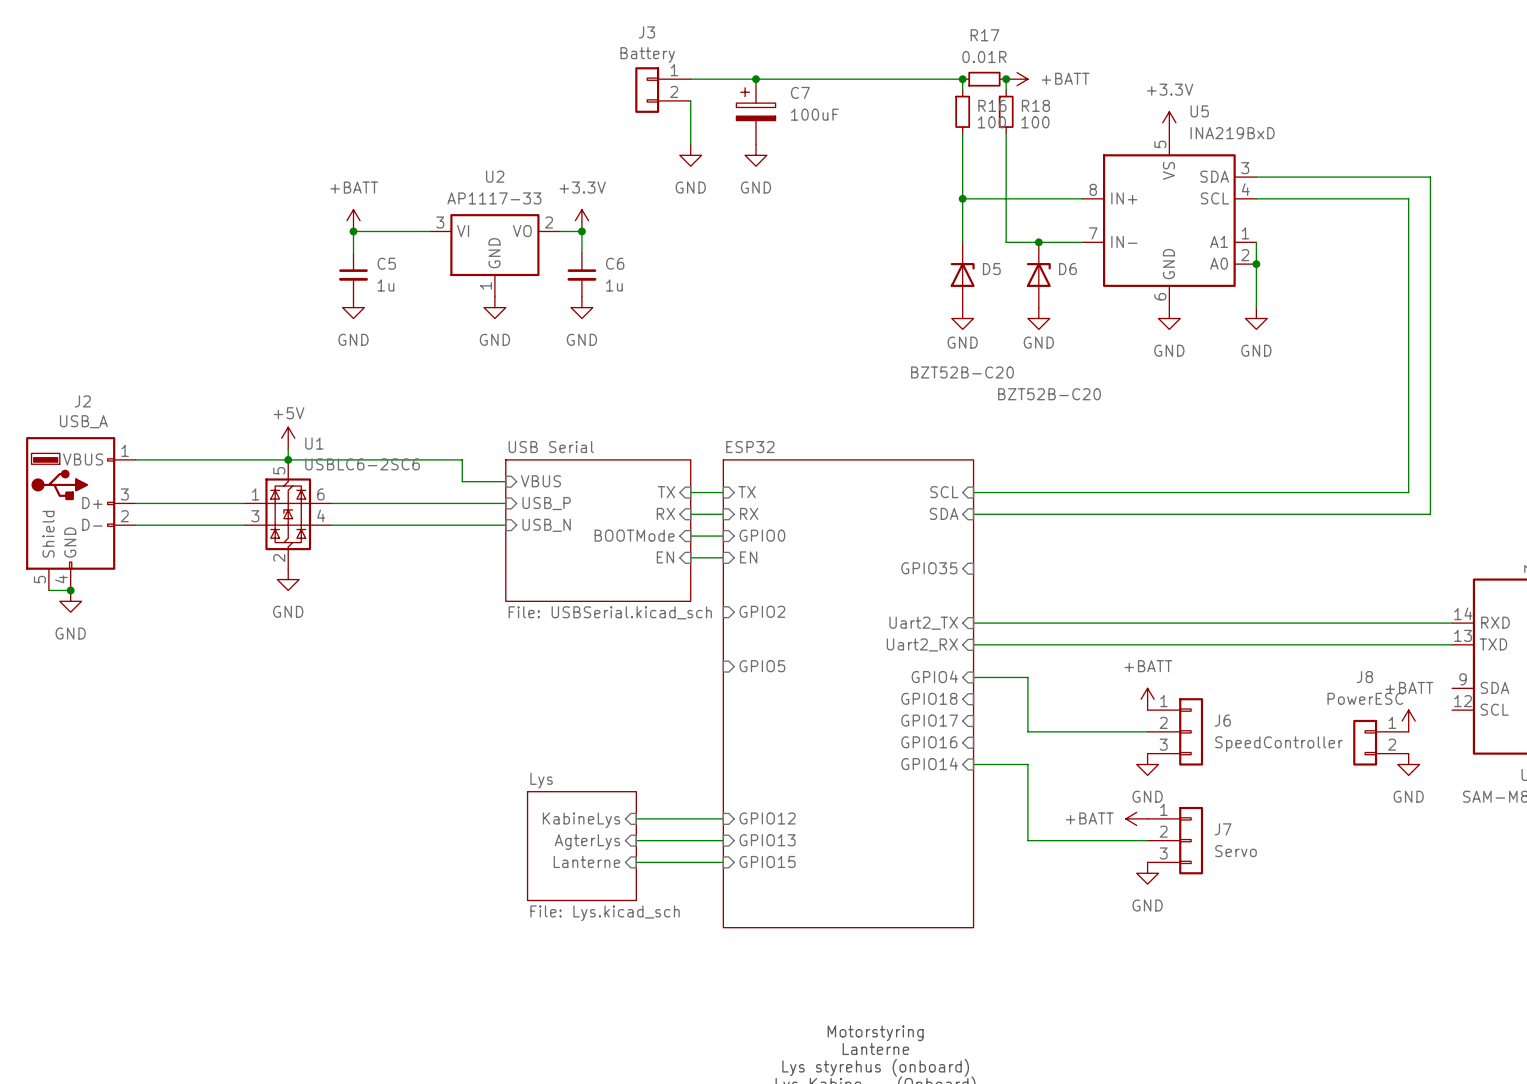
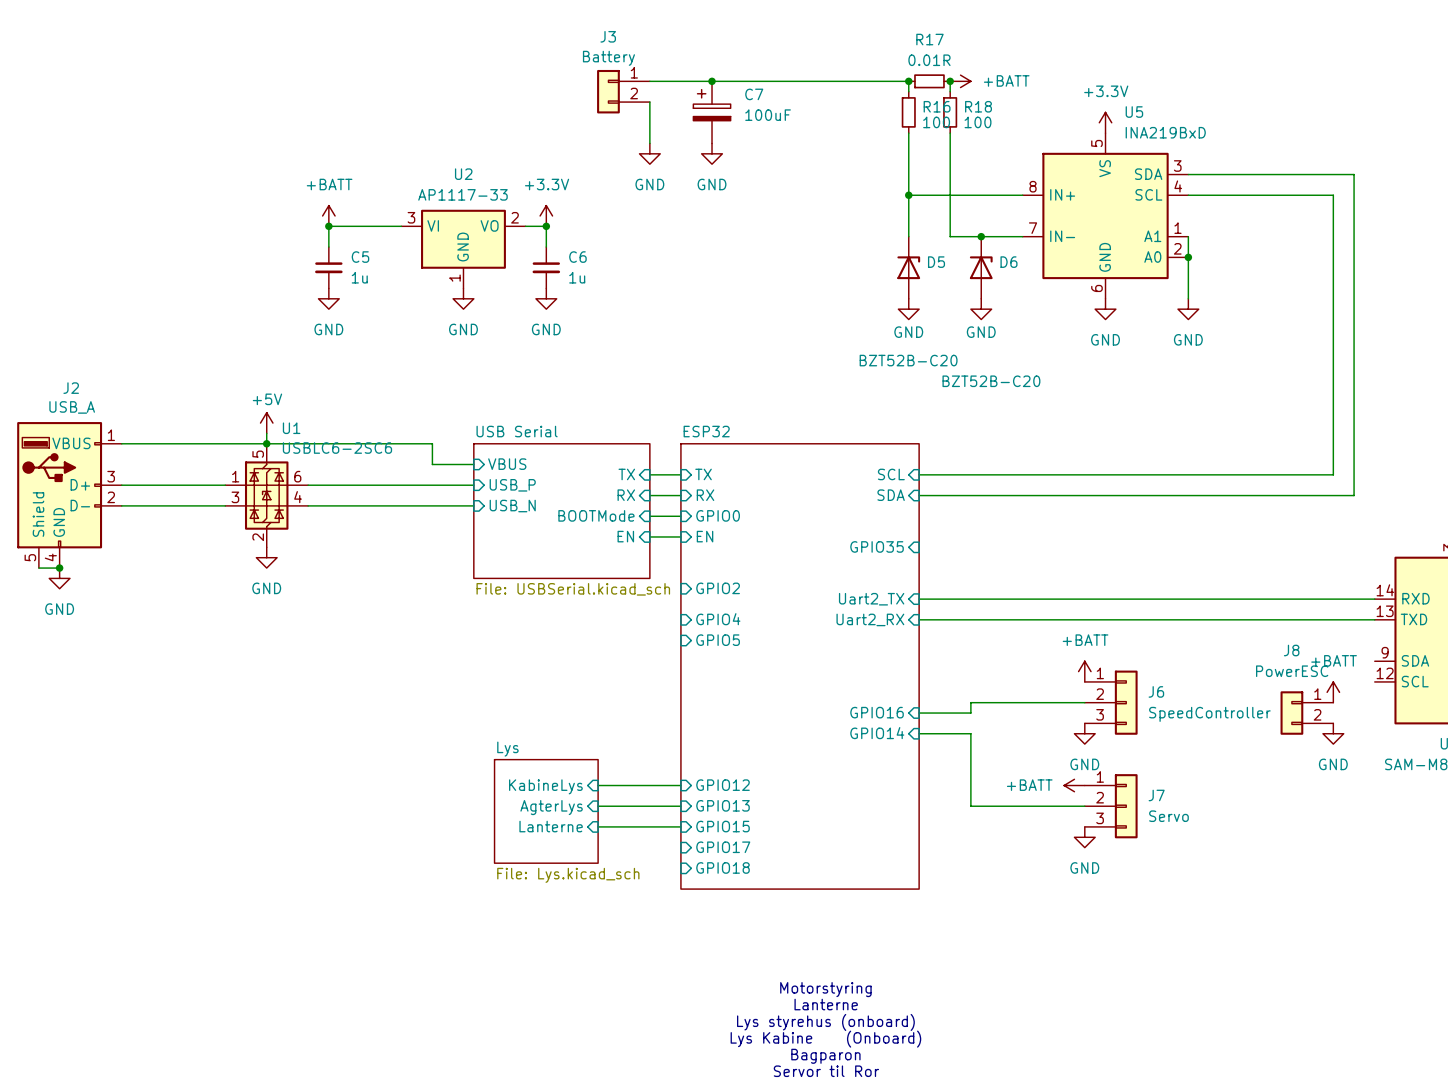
sheet pin: none -> GPIO4 (718, 619)
sheet pin: GPIO4 (934, 676) -> none
wire: (973, 677) (1027, 677) (1027, 731) -> (919, 713) (970, 713) (970, 702)
sheet pin: GPIO18 (929, 698) -> none
sheet pin: GPIO17 (929, 720) -> none
sheet pin: none -> GPIO17 (723, 847)
sheet pin: none -> GPIO18 (723, 867)

